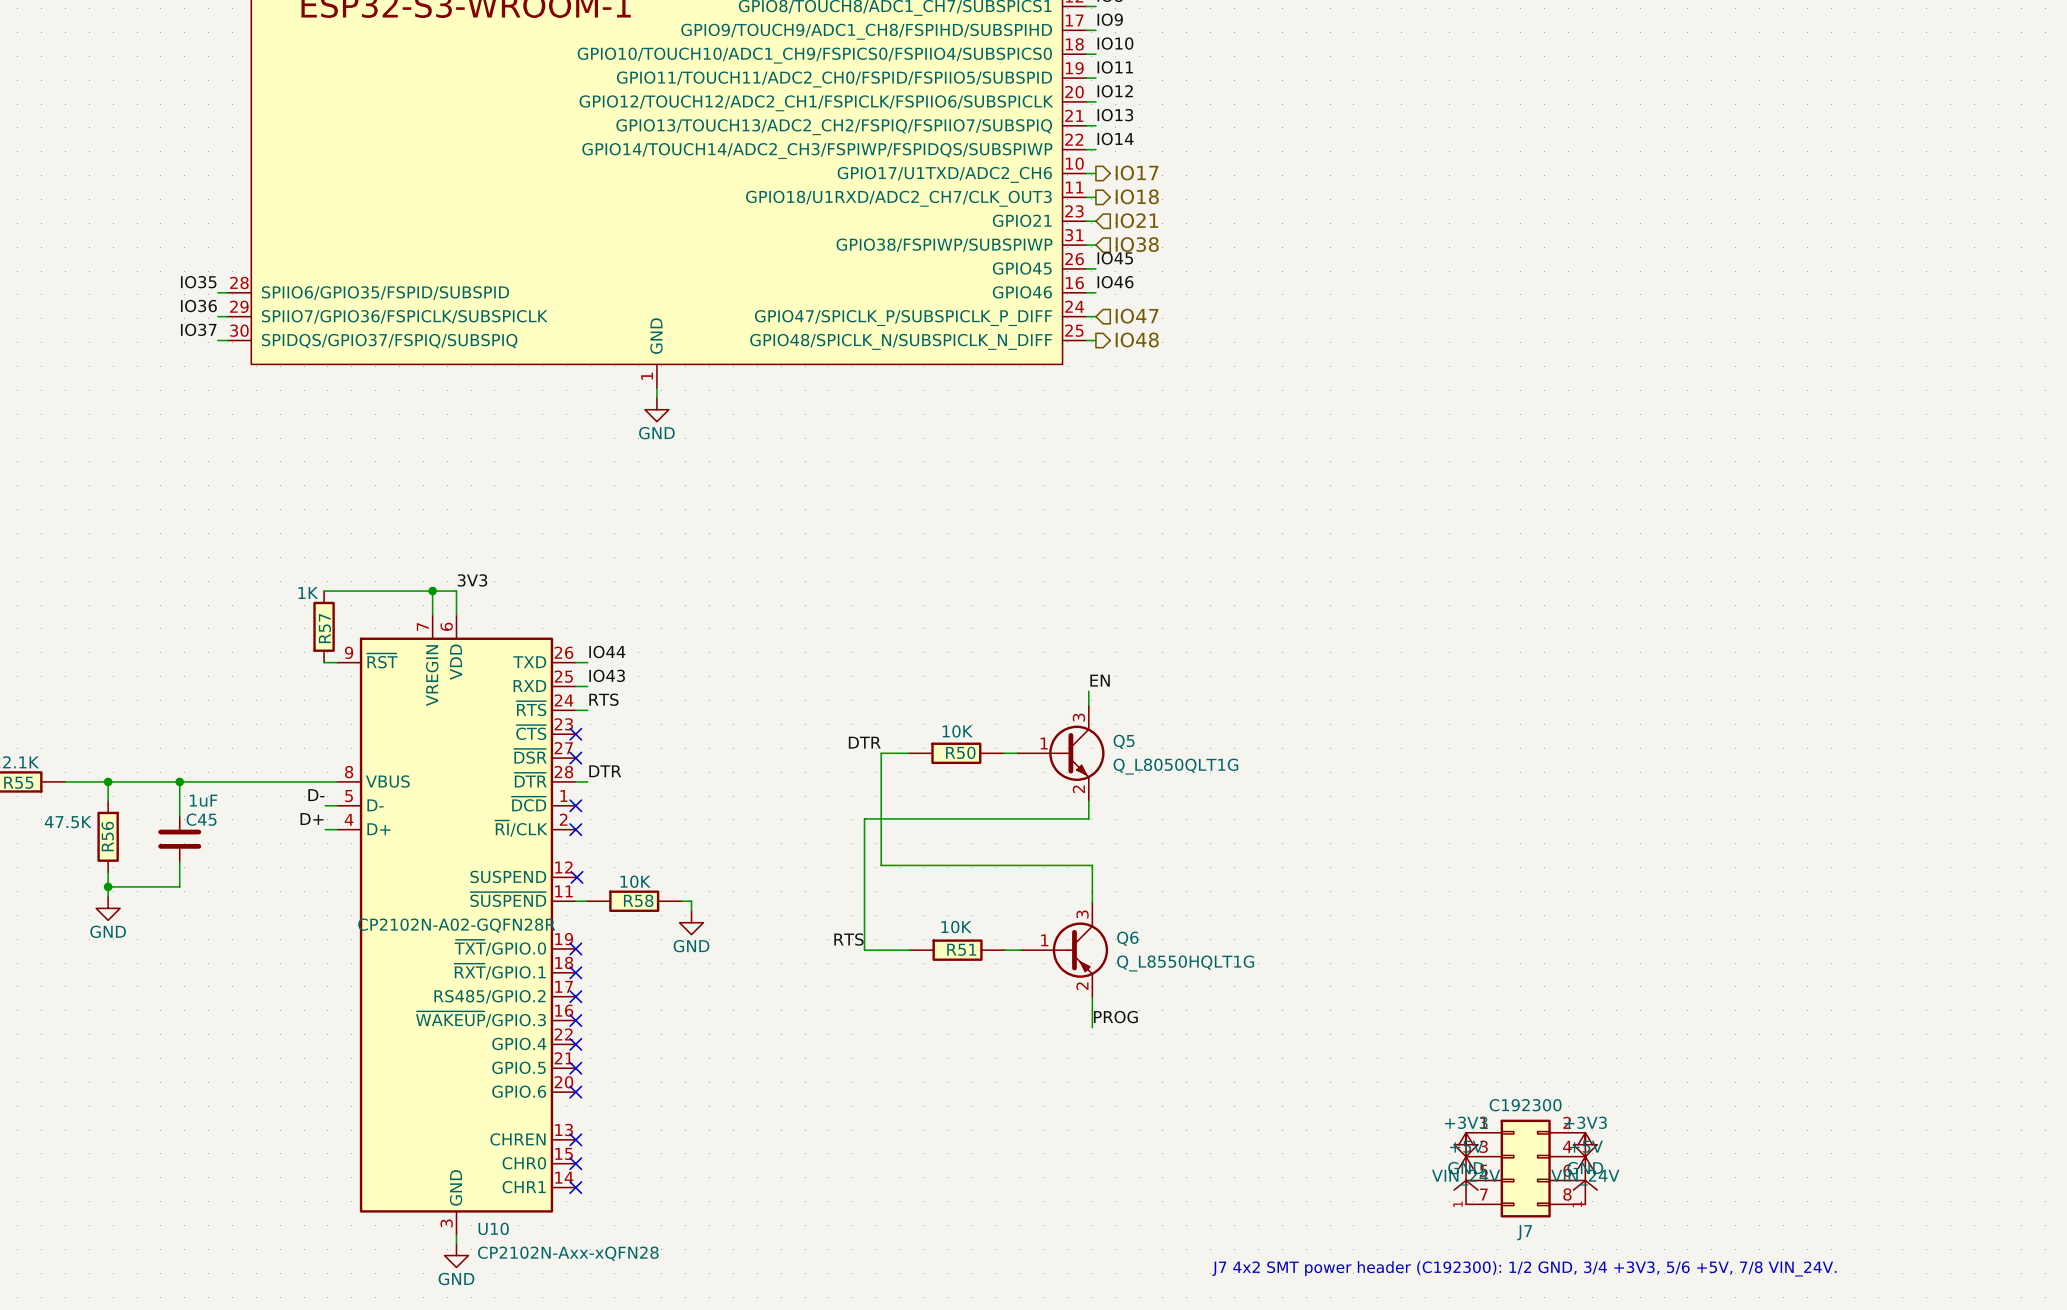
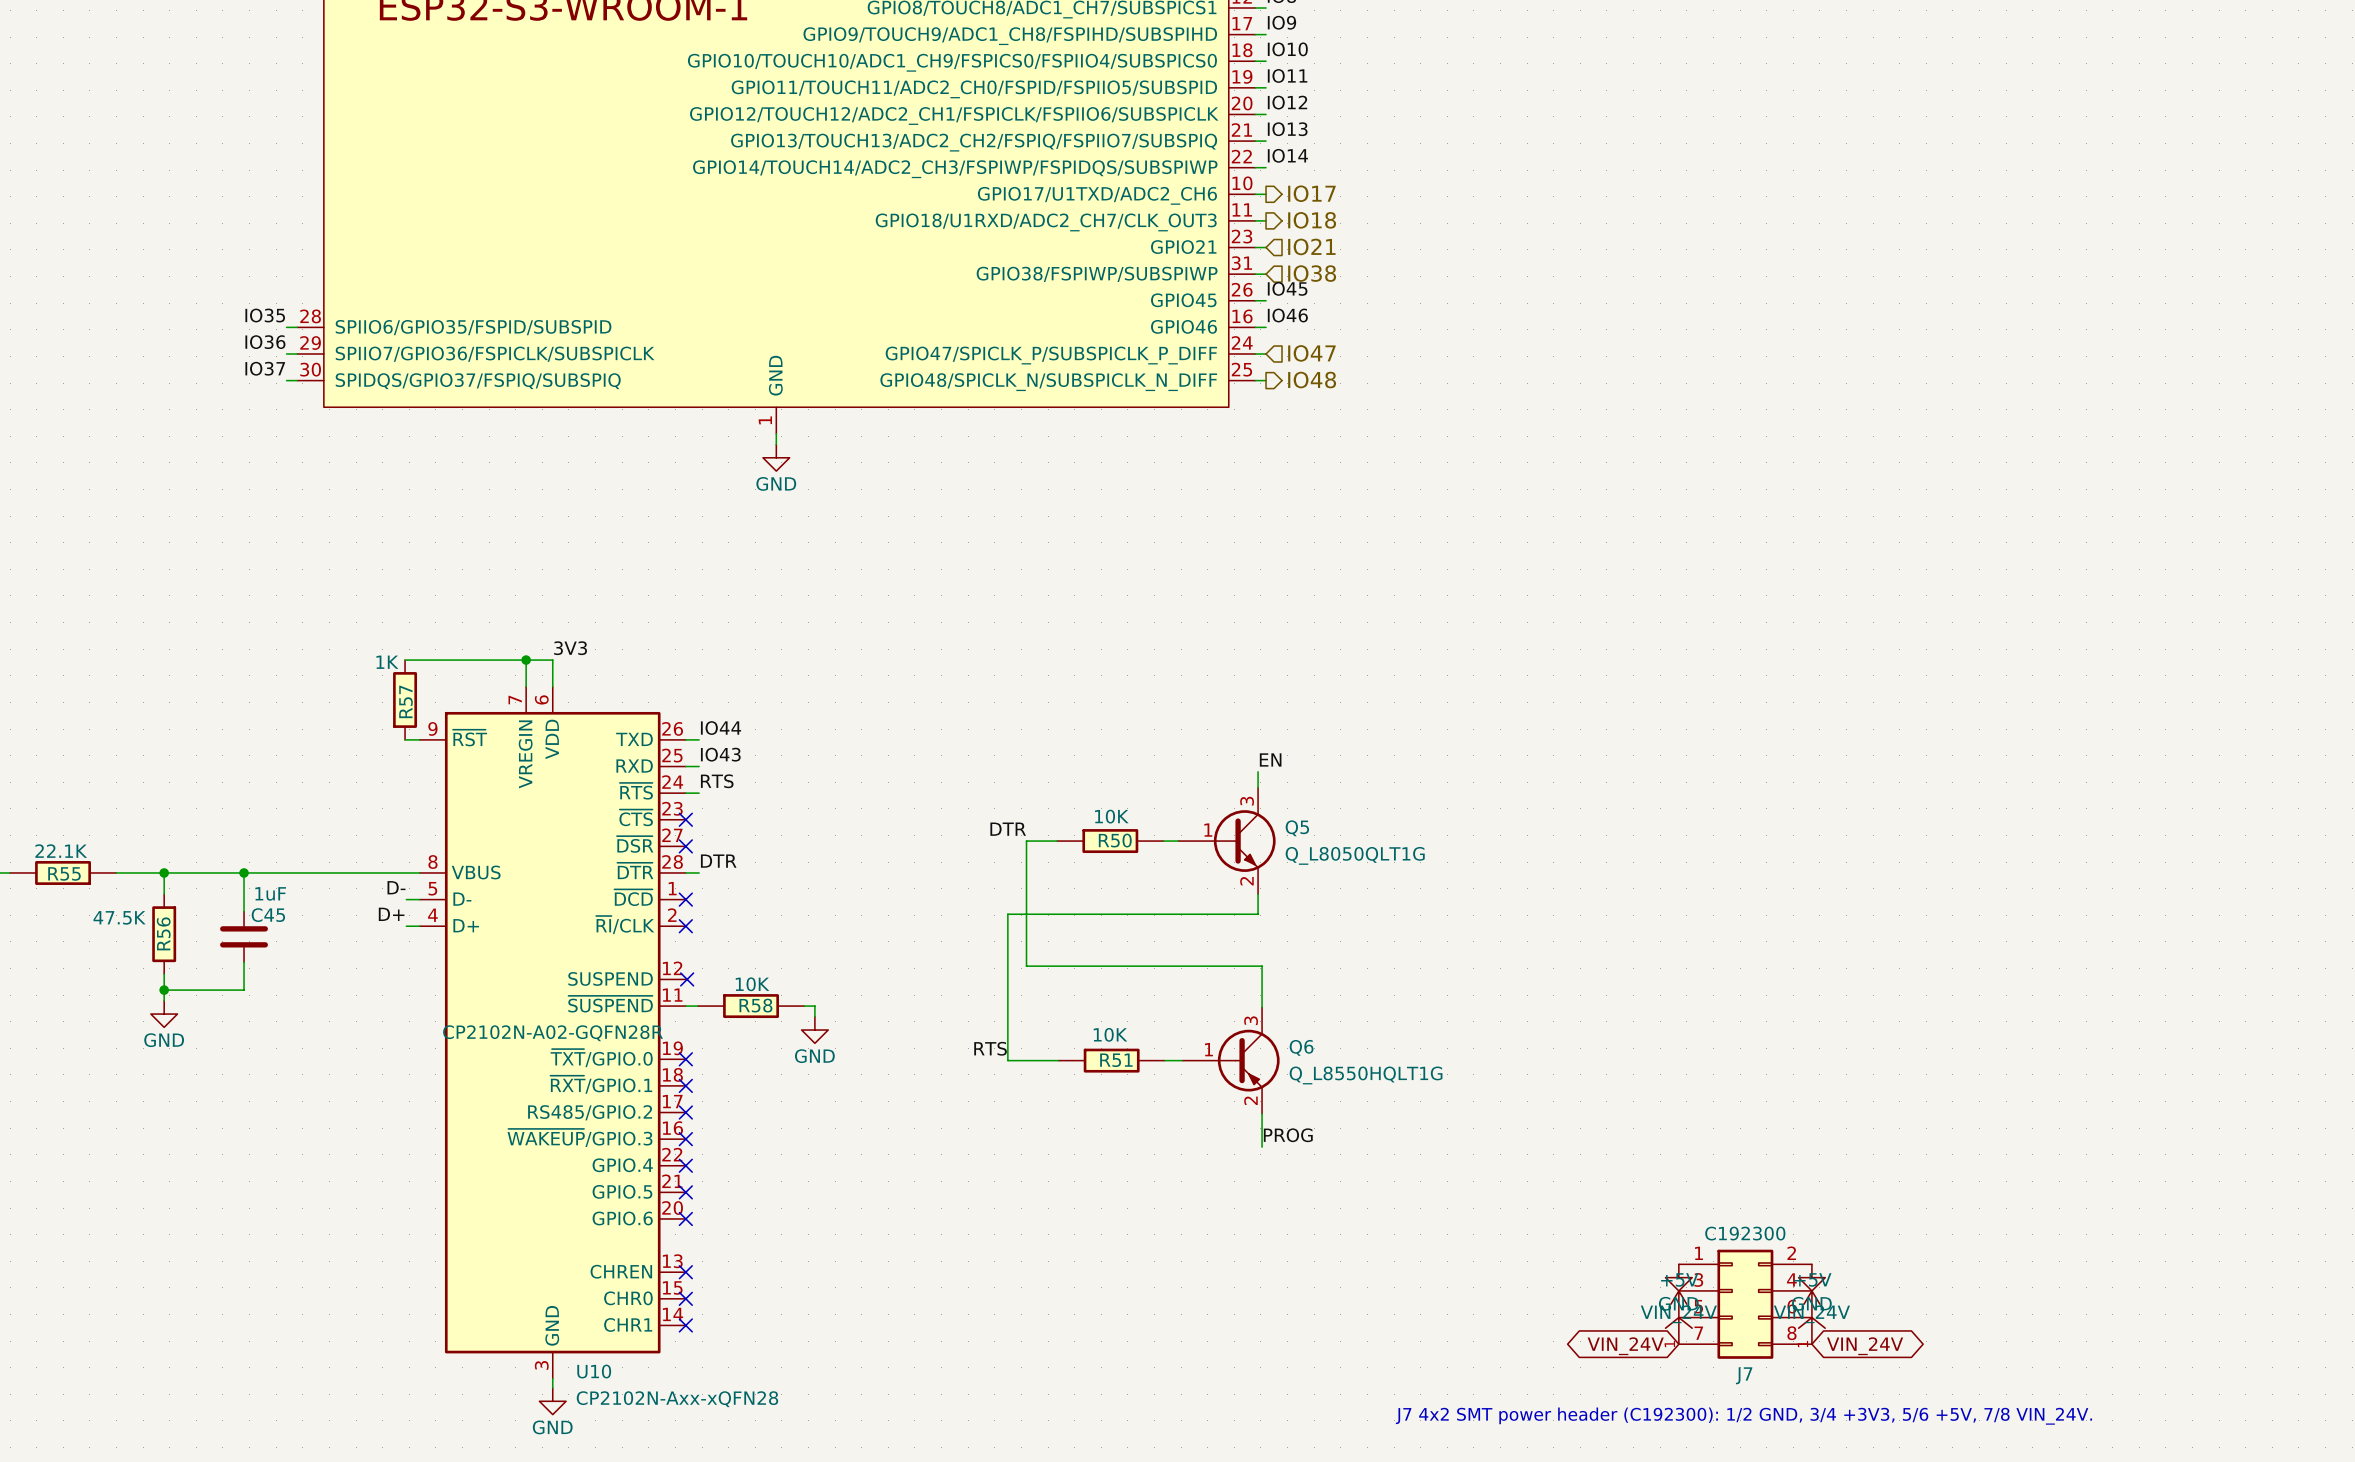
power symbol: +3V3 (1466, 1144) -> none
power symbol: +3V3 (1585, 1144) -> none
global label: none -> VIN_24V (1625, 1346)
global label: none -> VIN_24V (1865, 1346)

